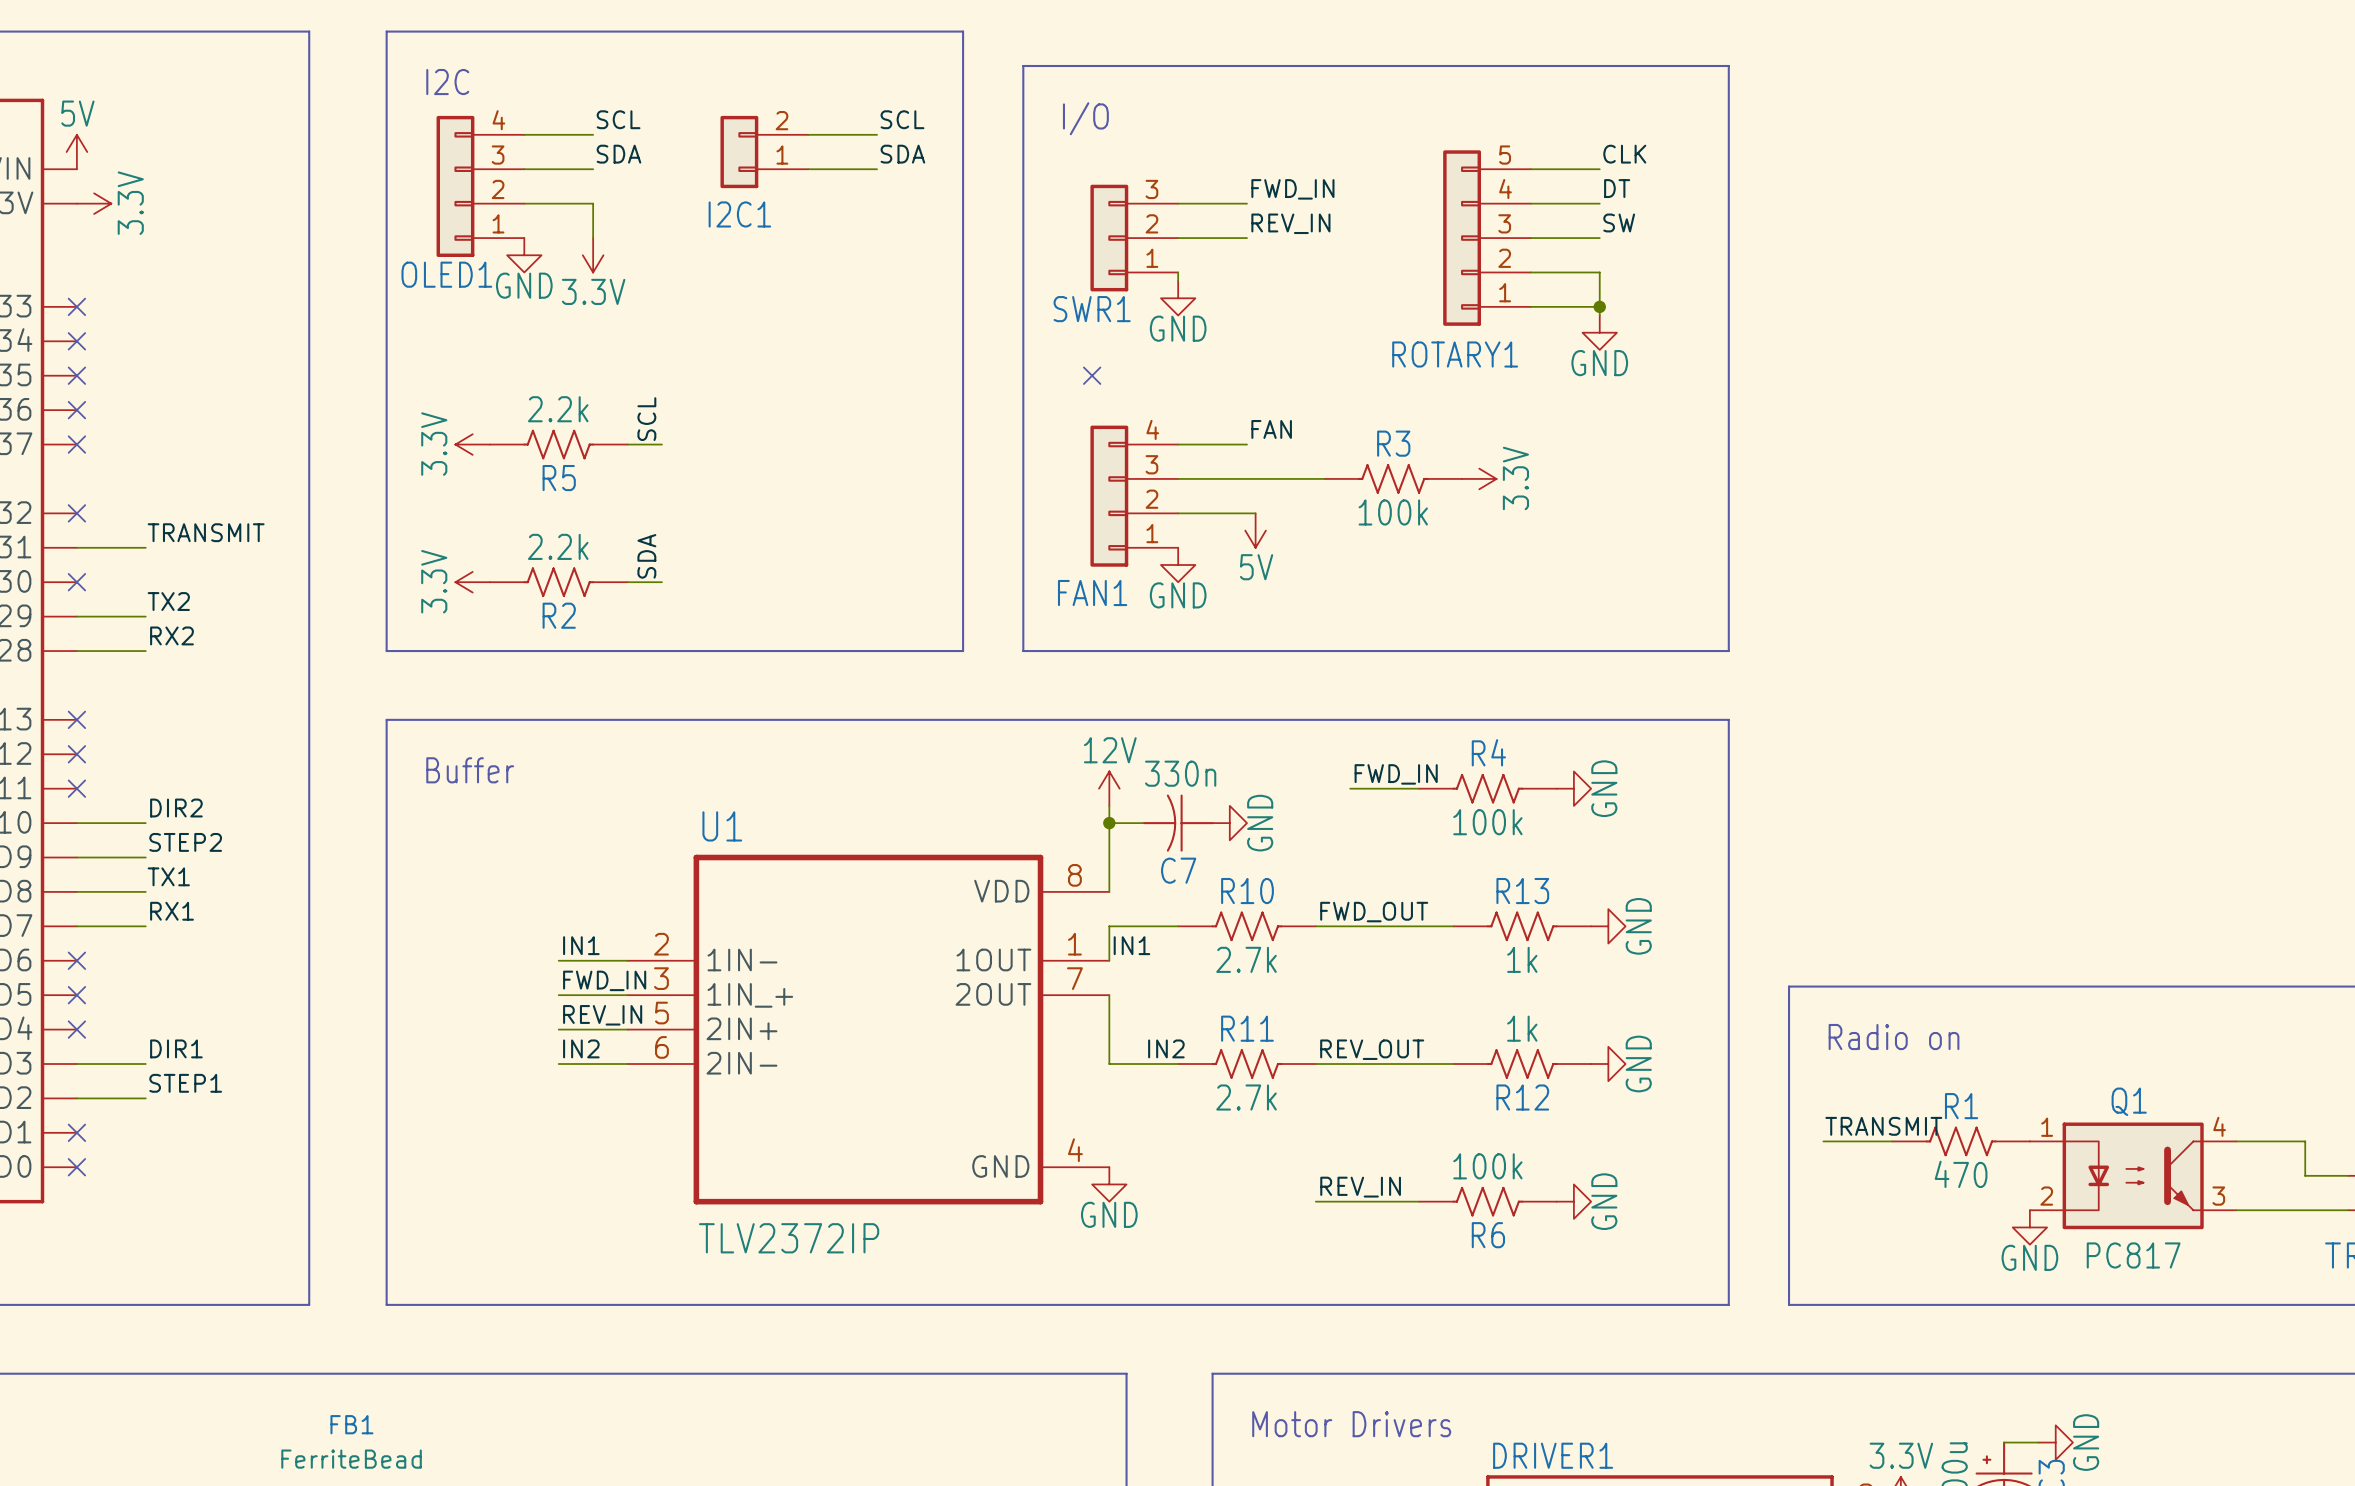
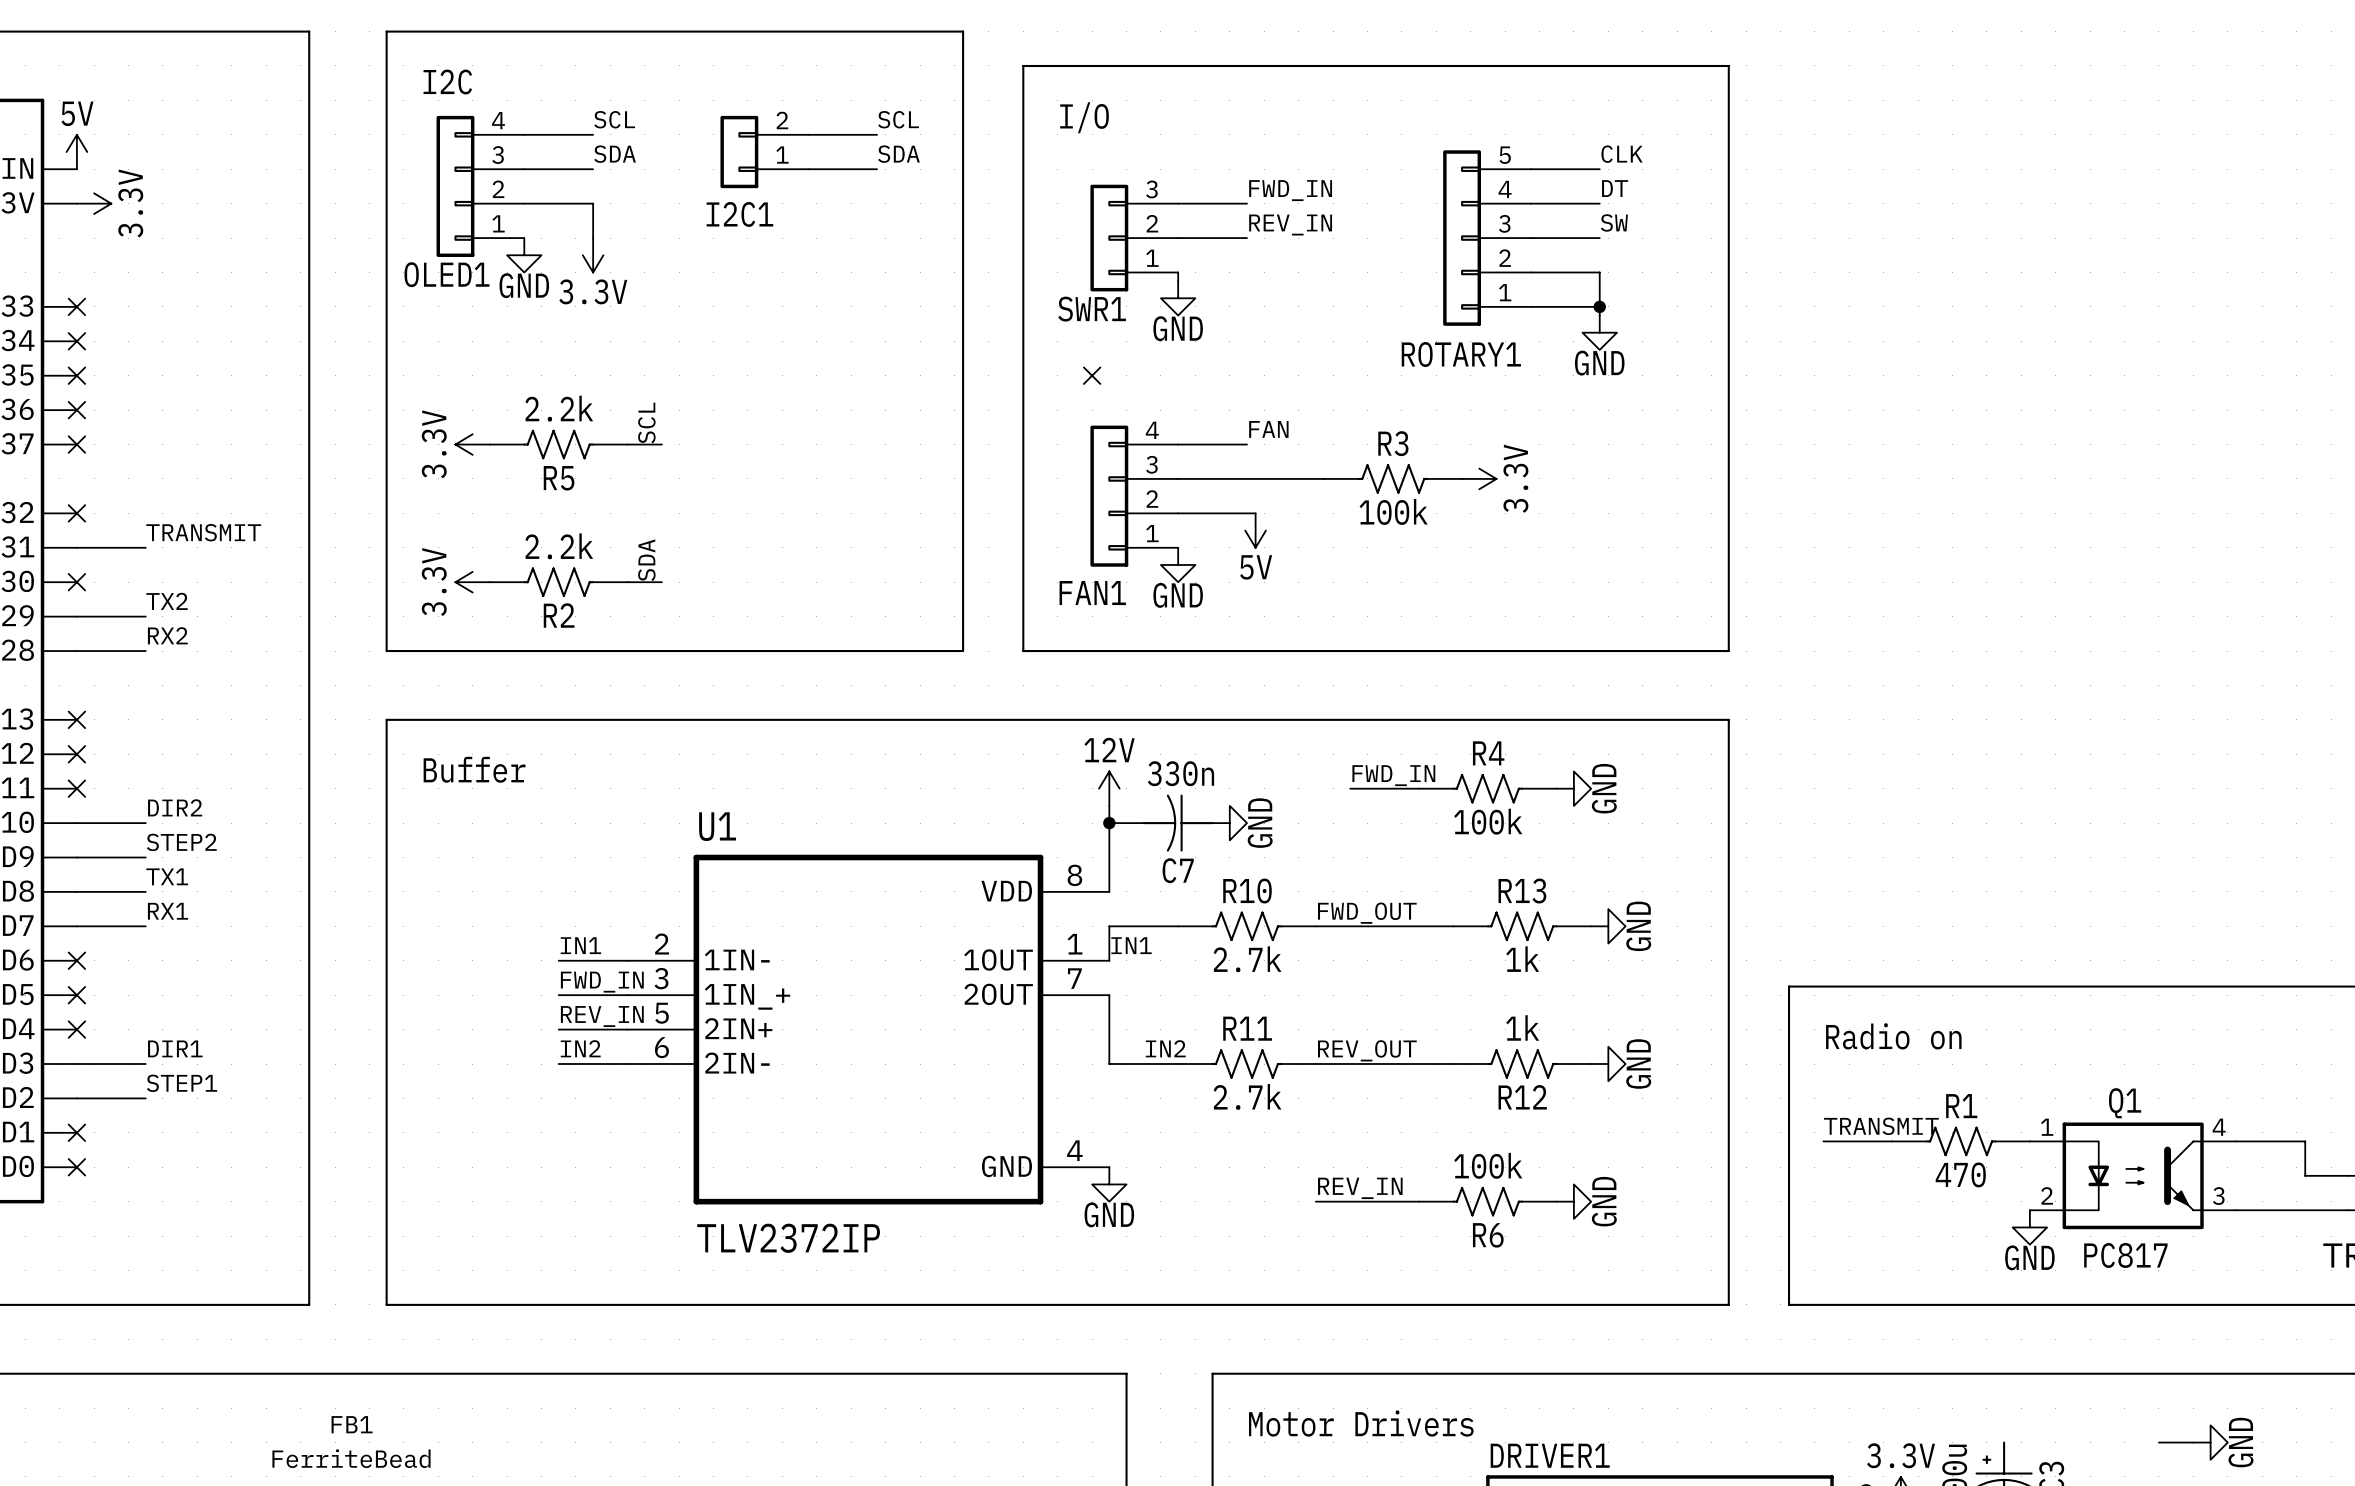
wire: (2004, 1442) (2038, 1442) -> (2158, 1442) (2193, 1442)
power symbol position: GND (2055, 1442) -> GND (2210, 1442)

